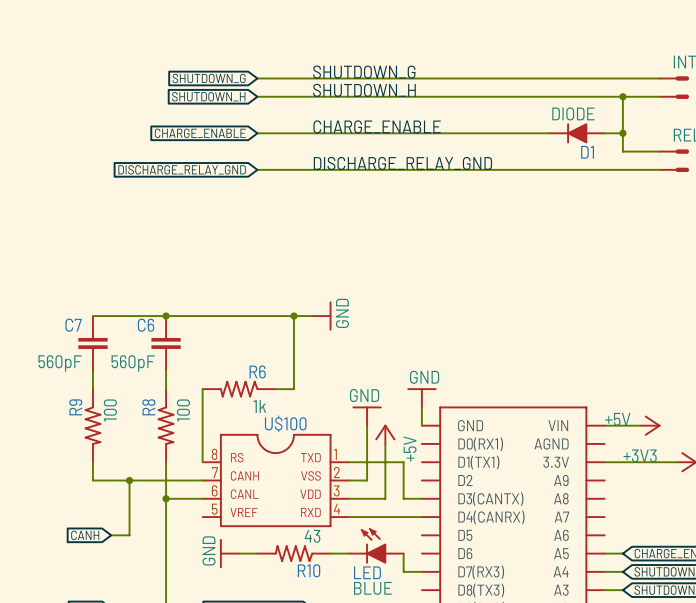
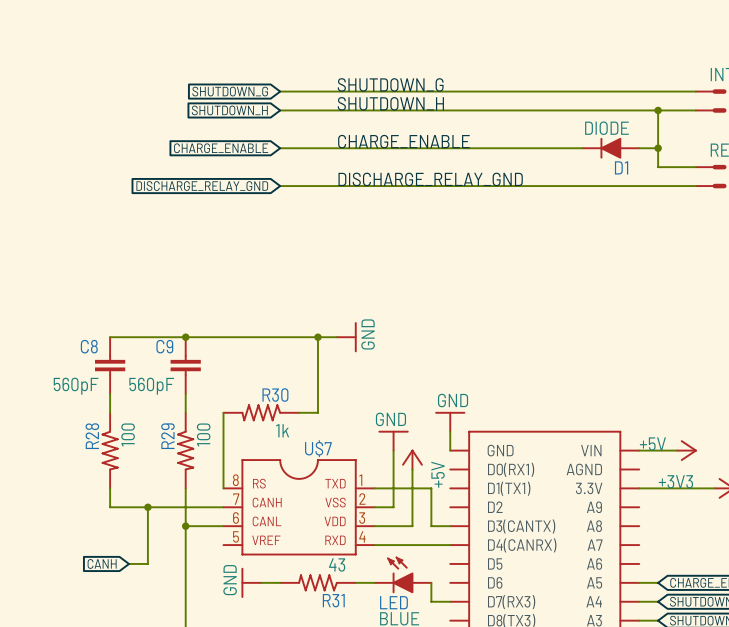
C7 name: C7 (73, 325) -> C8 (89, 346)
C6 name: C6 (146, 325) -> C9 (164, 346)
R6 name: R6 (257, 371) -> R30 (275, 395)
R9 name: R9 (75, 407) -> R28 (92, 436)
R8 name: R8 (148, 407) -> R29 (167, 436)
U$100 name: U$100 (285, 423) -> U$7 (318, 448)
R10 name: R10 (309, 570) -> R31 (333, 600)

